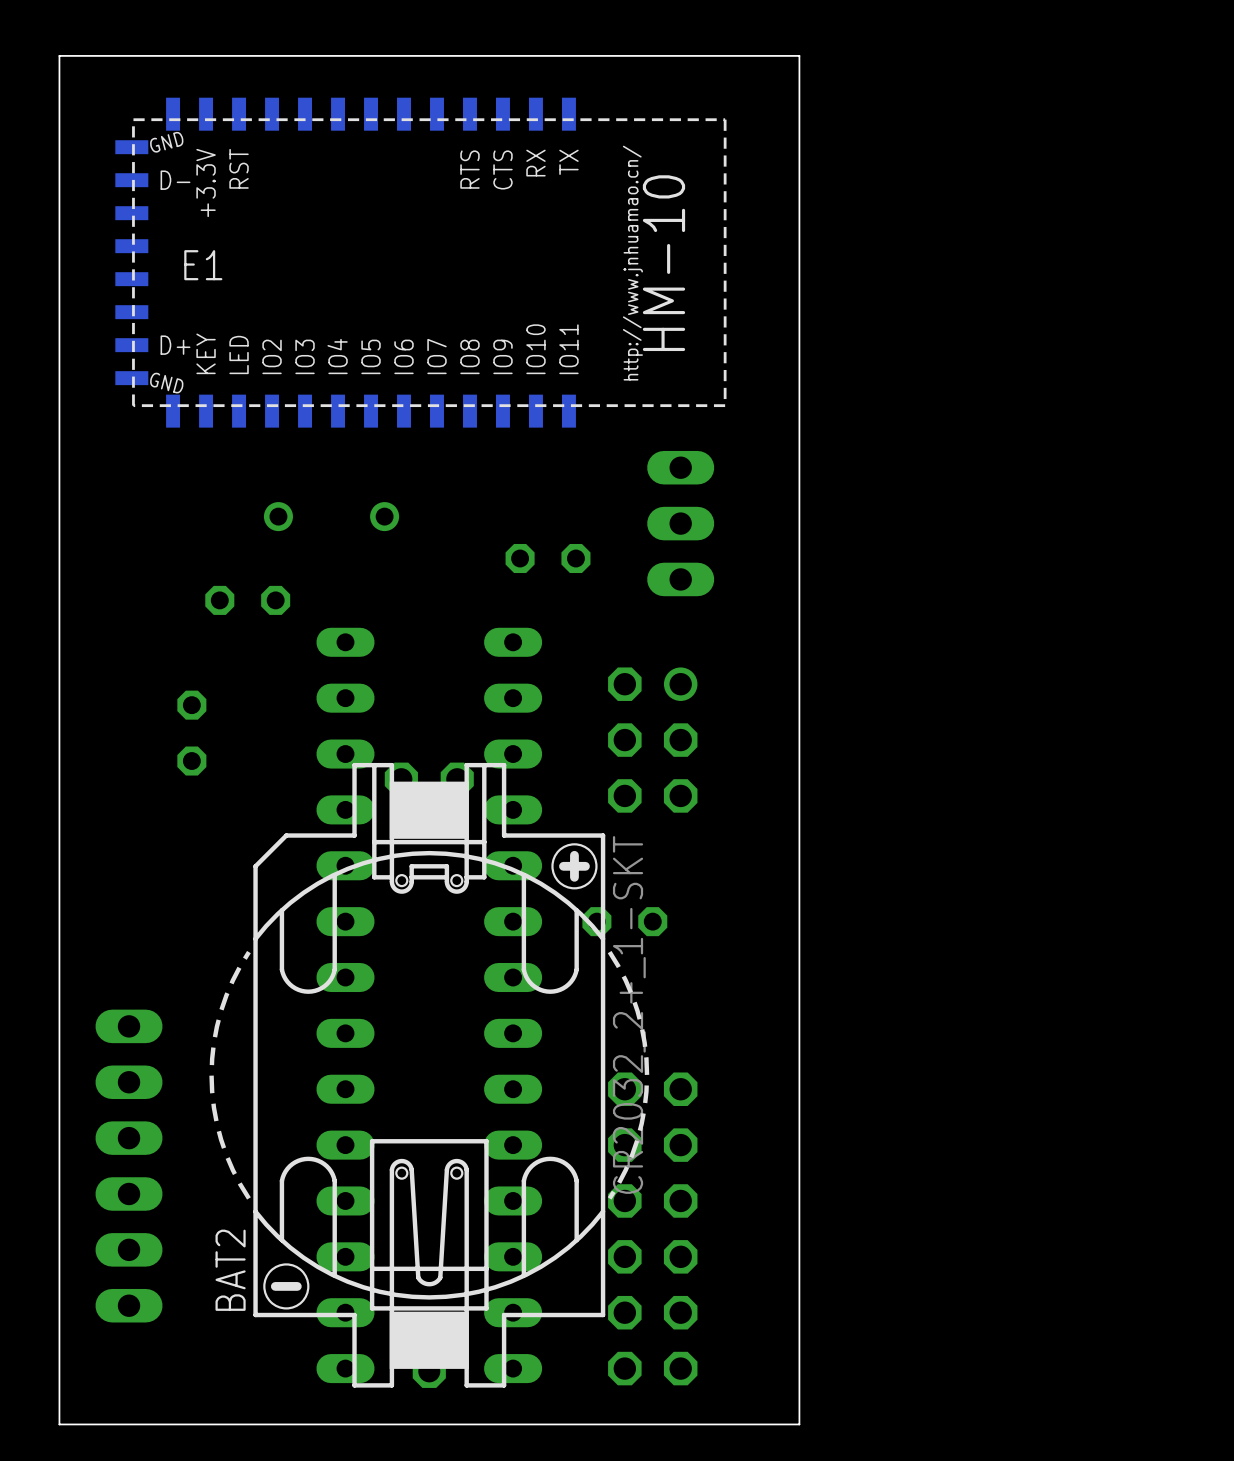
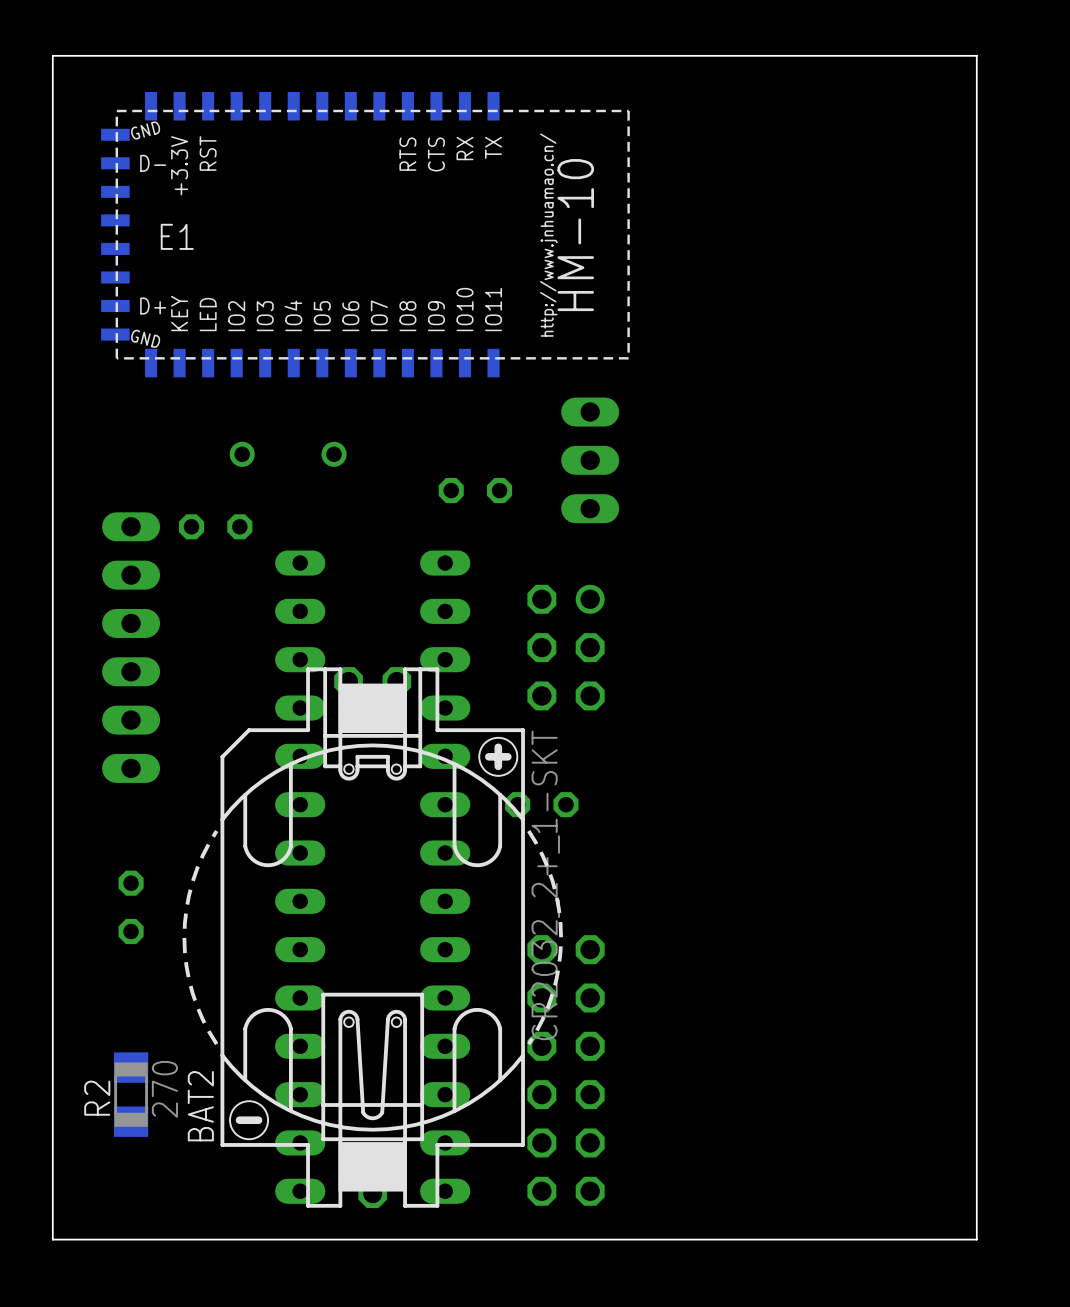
board edge: (799, 55) (799, 1424) -> (692, 55) (976, 55) (976, 1239) (692, 1239)
part position: (191, 733) -> (131, 907)
part position: (129, 1166) -> (131, 647)
R2: none -> 270 (131, 1094)

